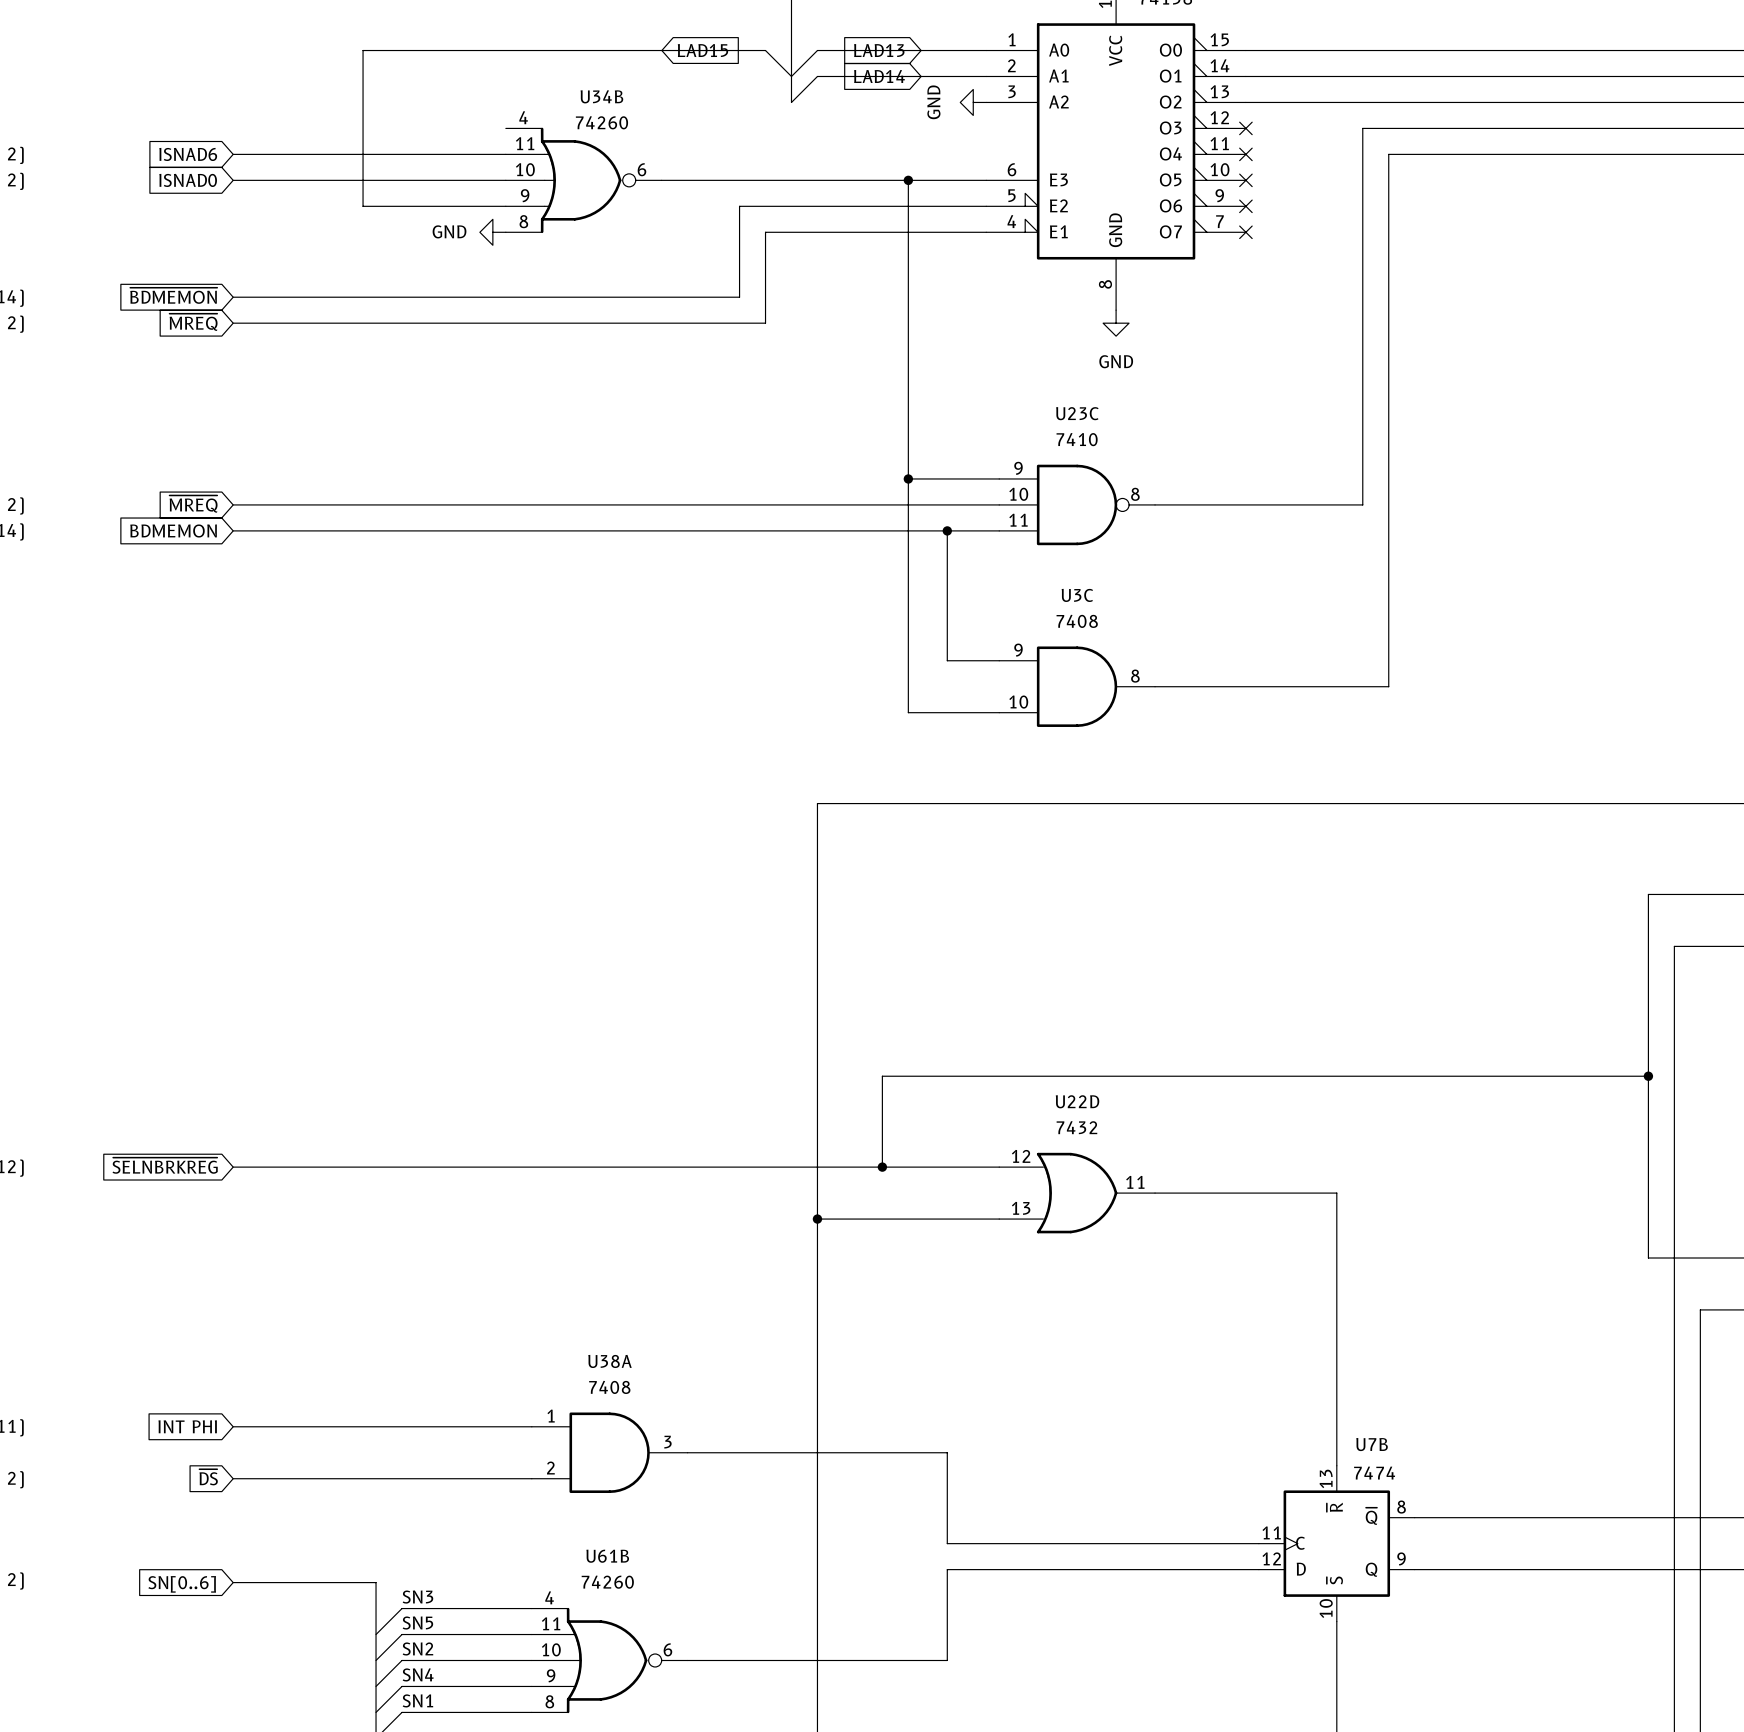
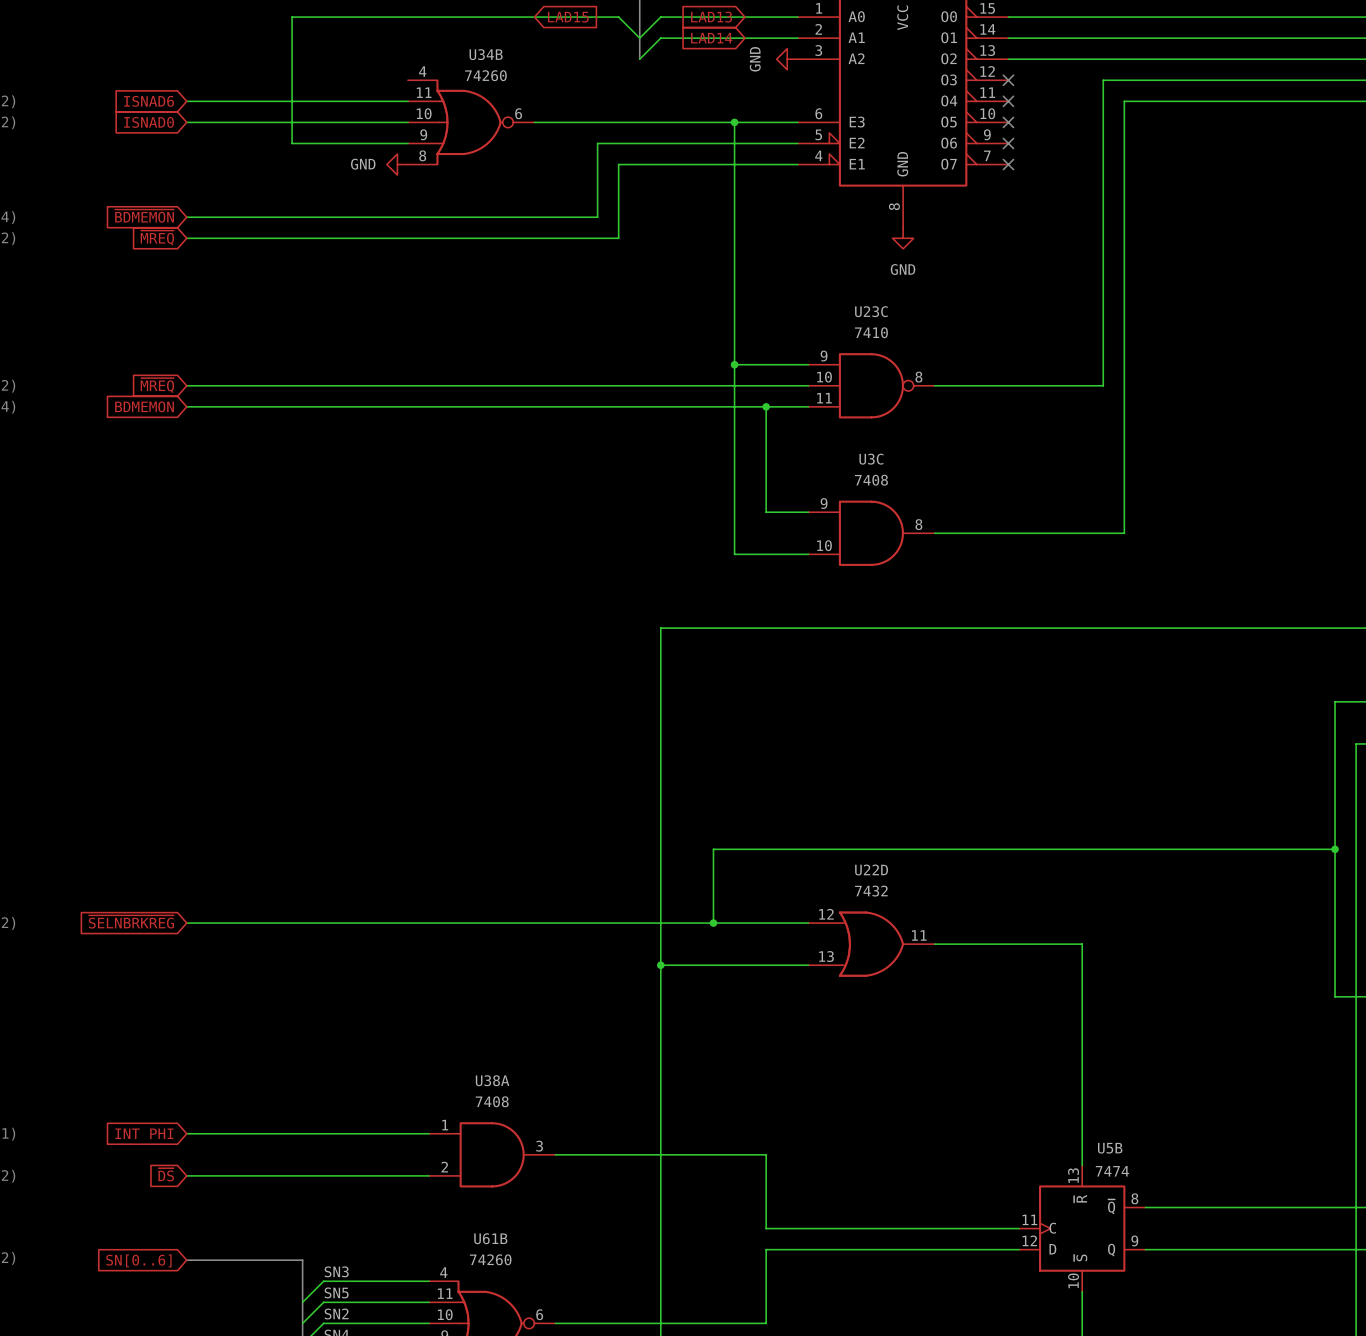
U7B name: U7B (1372, 1444) -> U5B (1110, 1148)

